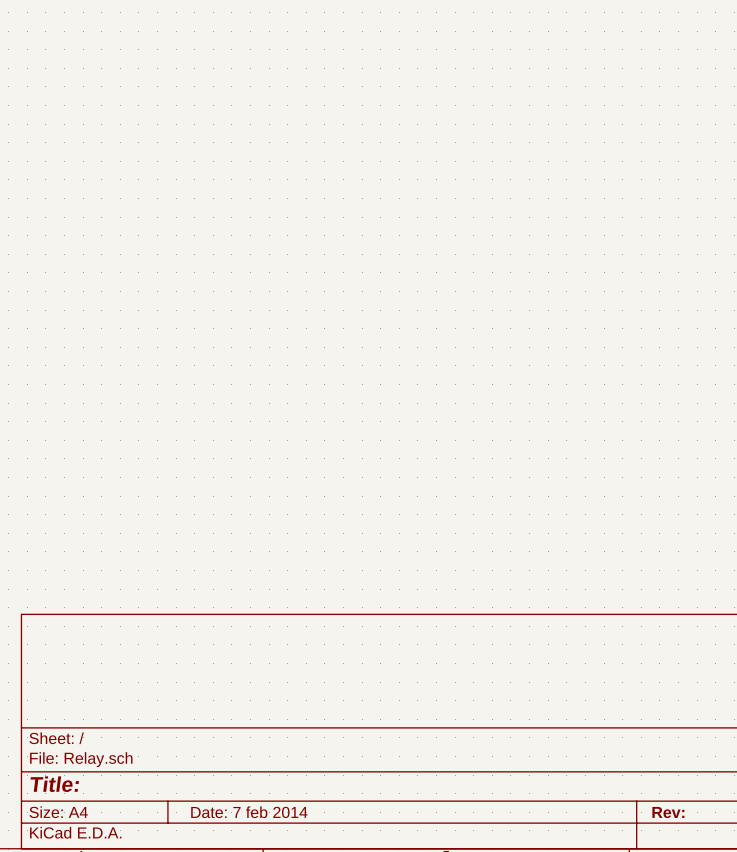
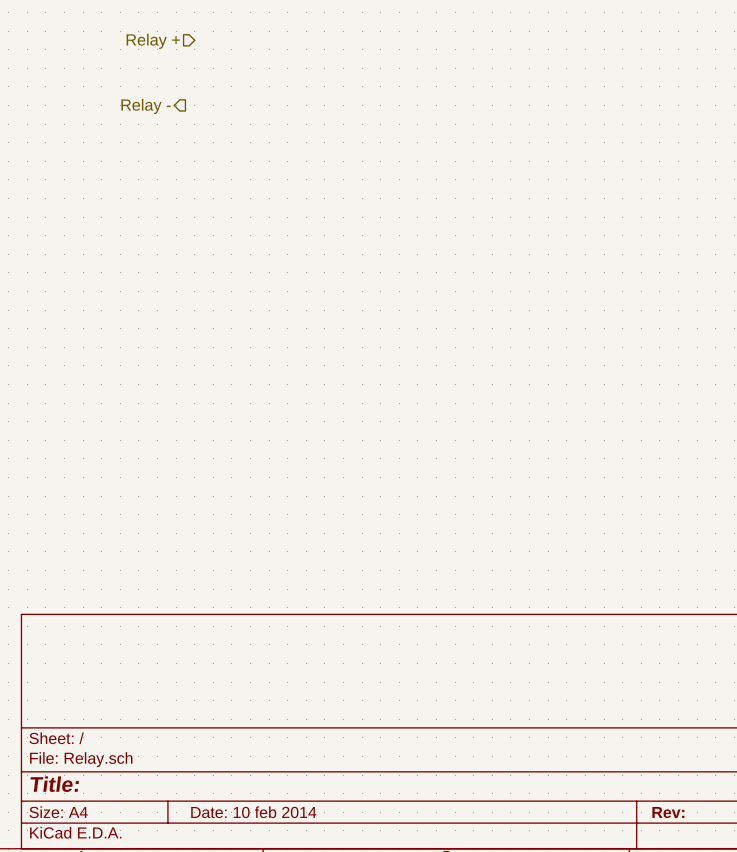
hierarchical label: none -> Relay + (153, 41)
hierarchical label: none -> Relay - (146, 106)
title block: Date: 7 feb 2014 (249, 812) -> Date: 10 feb 2014 (253, 812)

